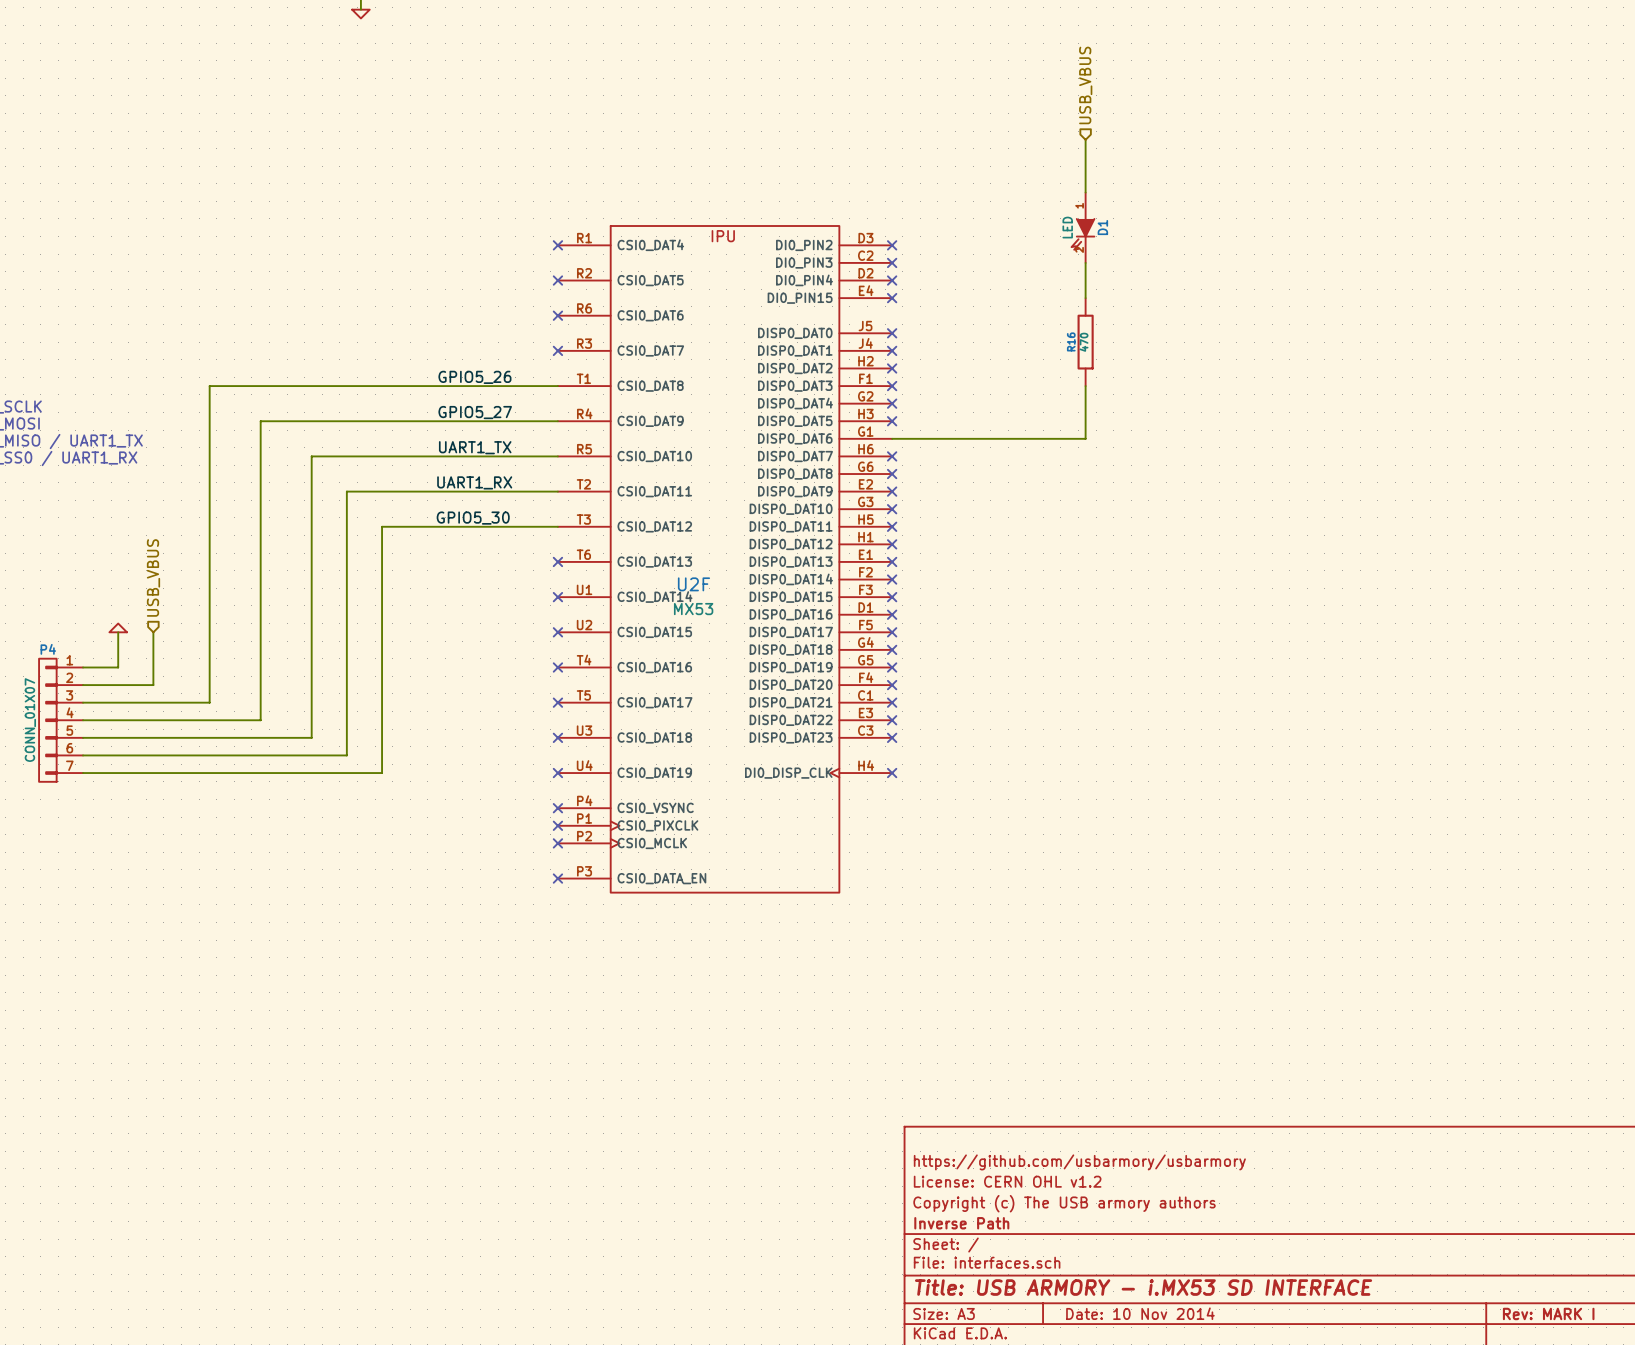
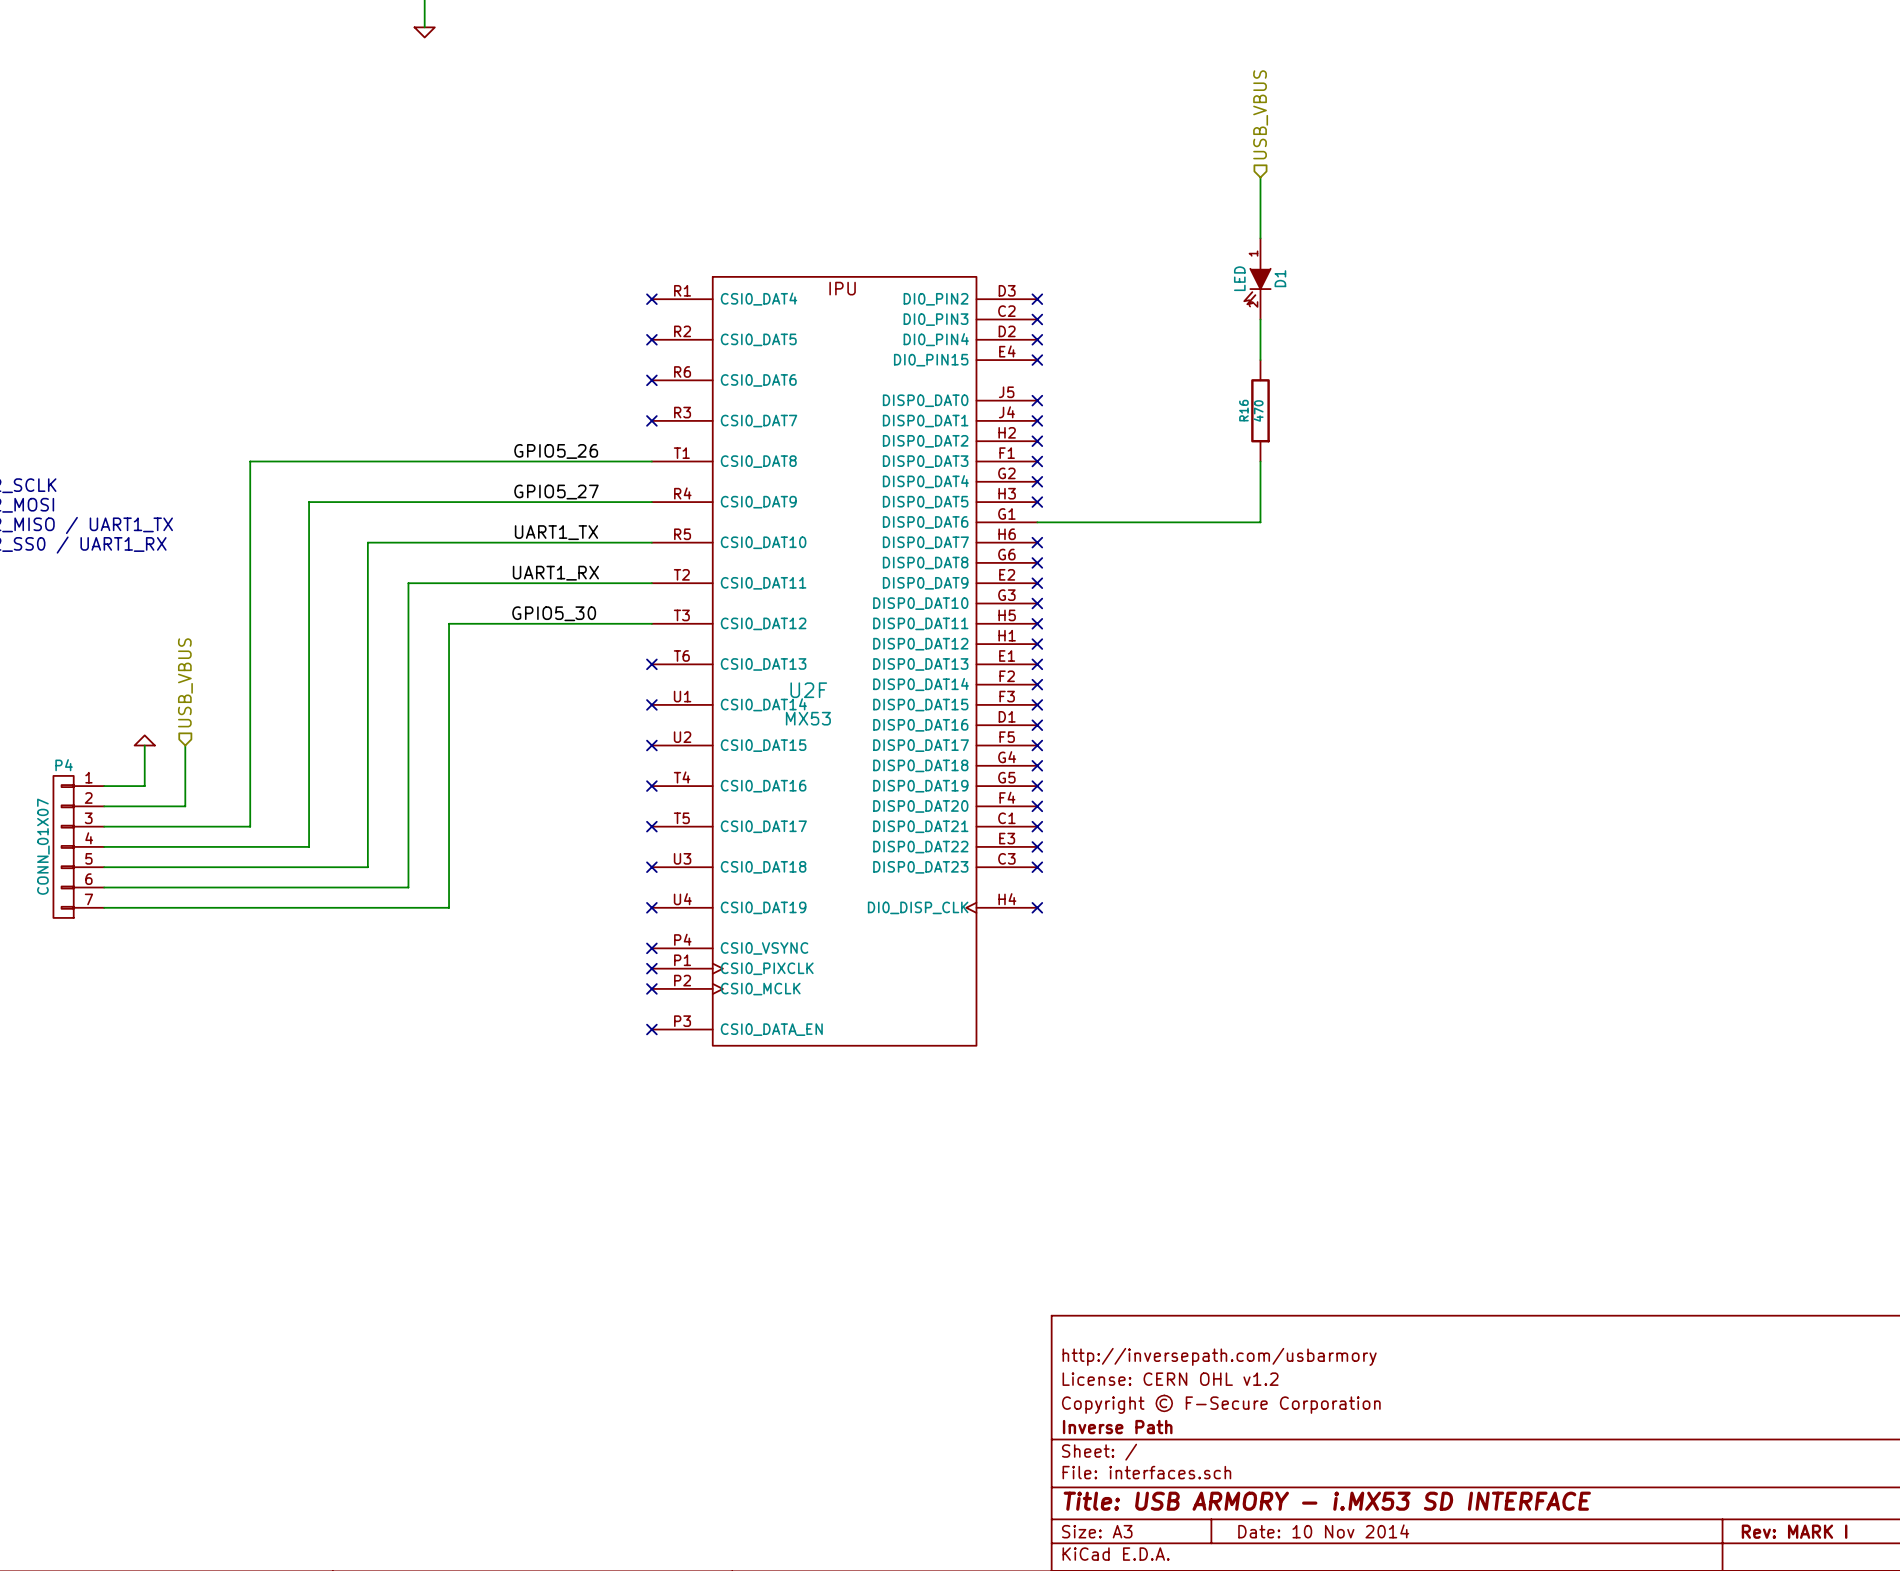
title block: https://github.com/usbarmory/usbarmory (1079, 1162) -> http://inversepath.com/usbarmory (1219, 1356)
title block: Copyright (c) The USB armory authors (1064, 1203) -> Copyright © F-Secure Corporation (1221, 1404)

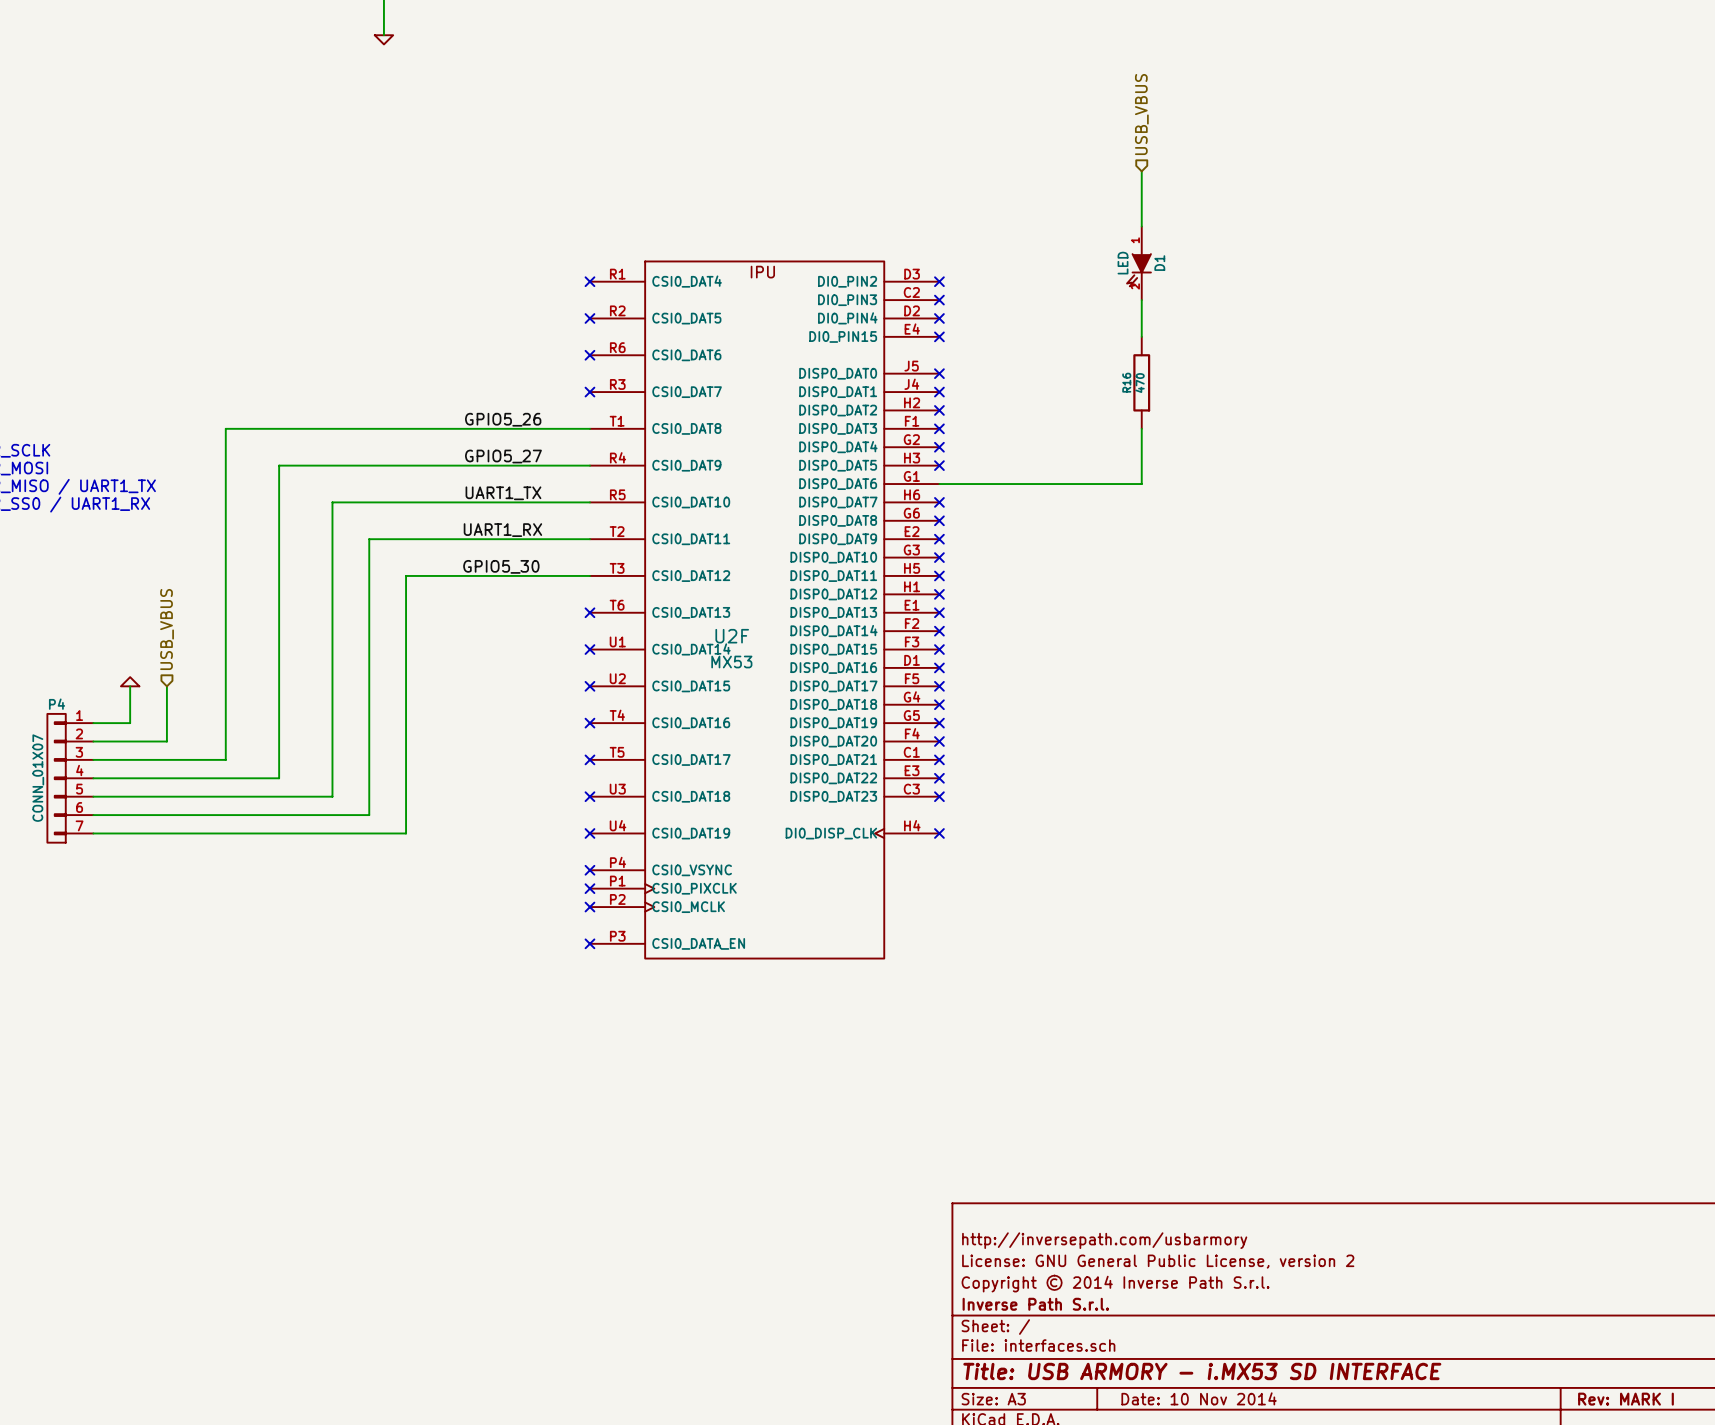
title block: License: CERN OHL v1.2 (1170, 1379) -> License: GNU General Public License, version 2 (1158, 1261)
title block: Copyright © F-Secure Corporation (1221, 1404) -> Copyright © 2014 Inverse Path S.r.l. (1115, 1283)
title block: Inverse Path (1117, 1427) -> Inverse Path S.r.l. (1035, 1304)

